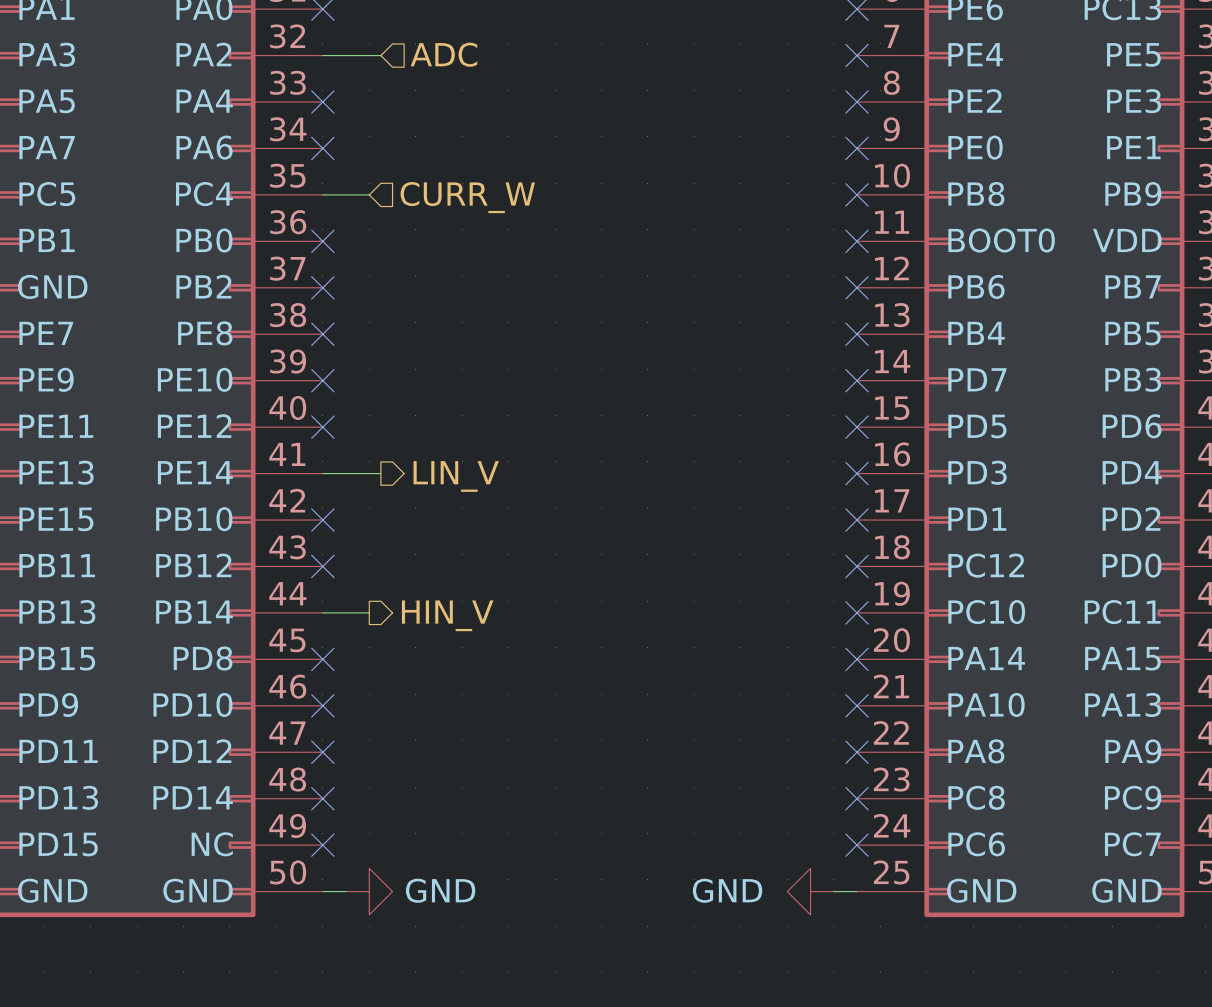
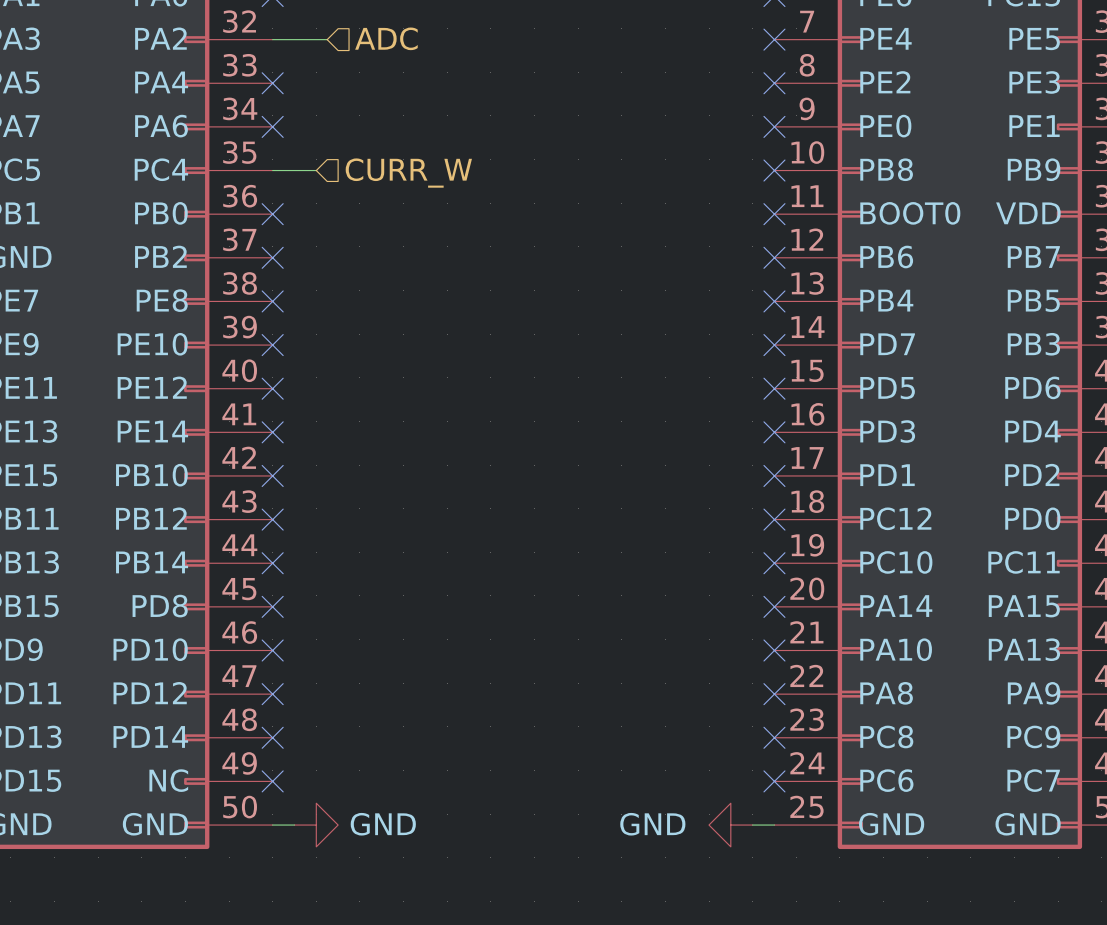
wire: (322, 473) (380, 473) -> none
no-connect mark: none -> (272, 432)
hierarchical label: LIN_V (456, 476) -> none
wire: (322, 612) (369, 612) -> none
no-connect mark: none -> (272, 563)
hierarchical label: HIN_V (447, 615) -> none

